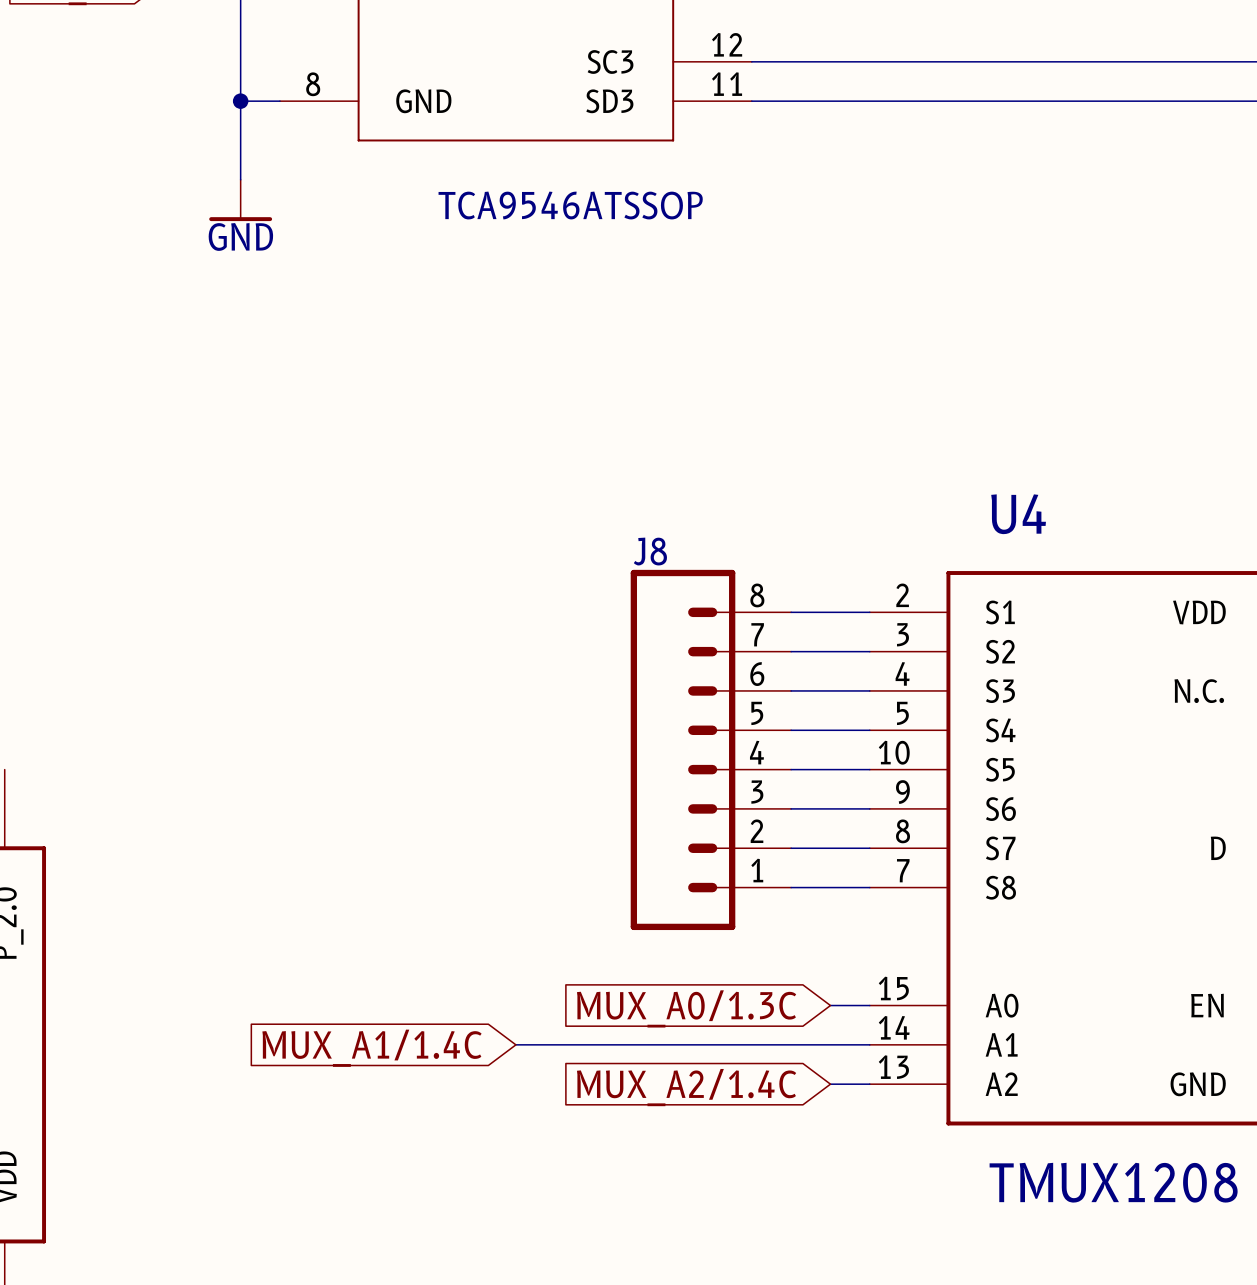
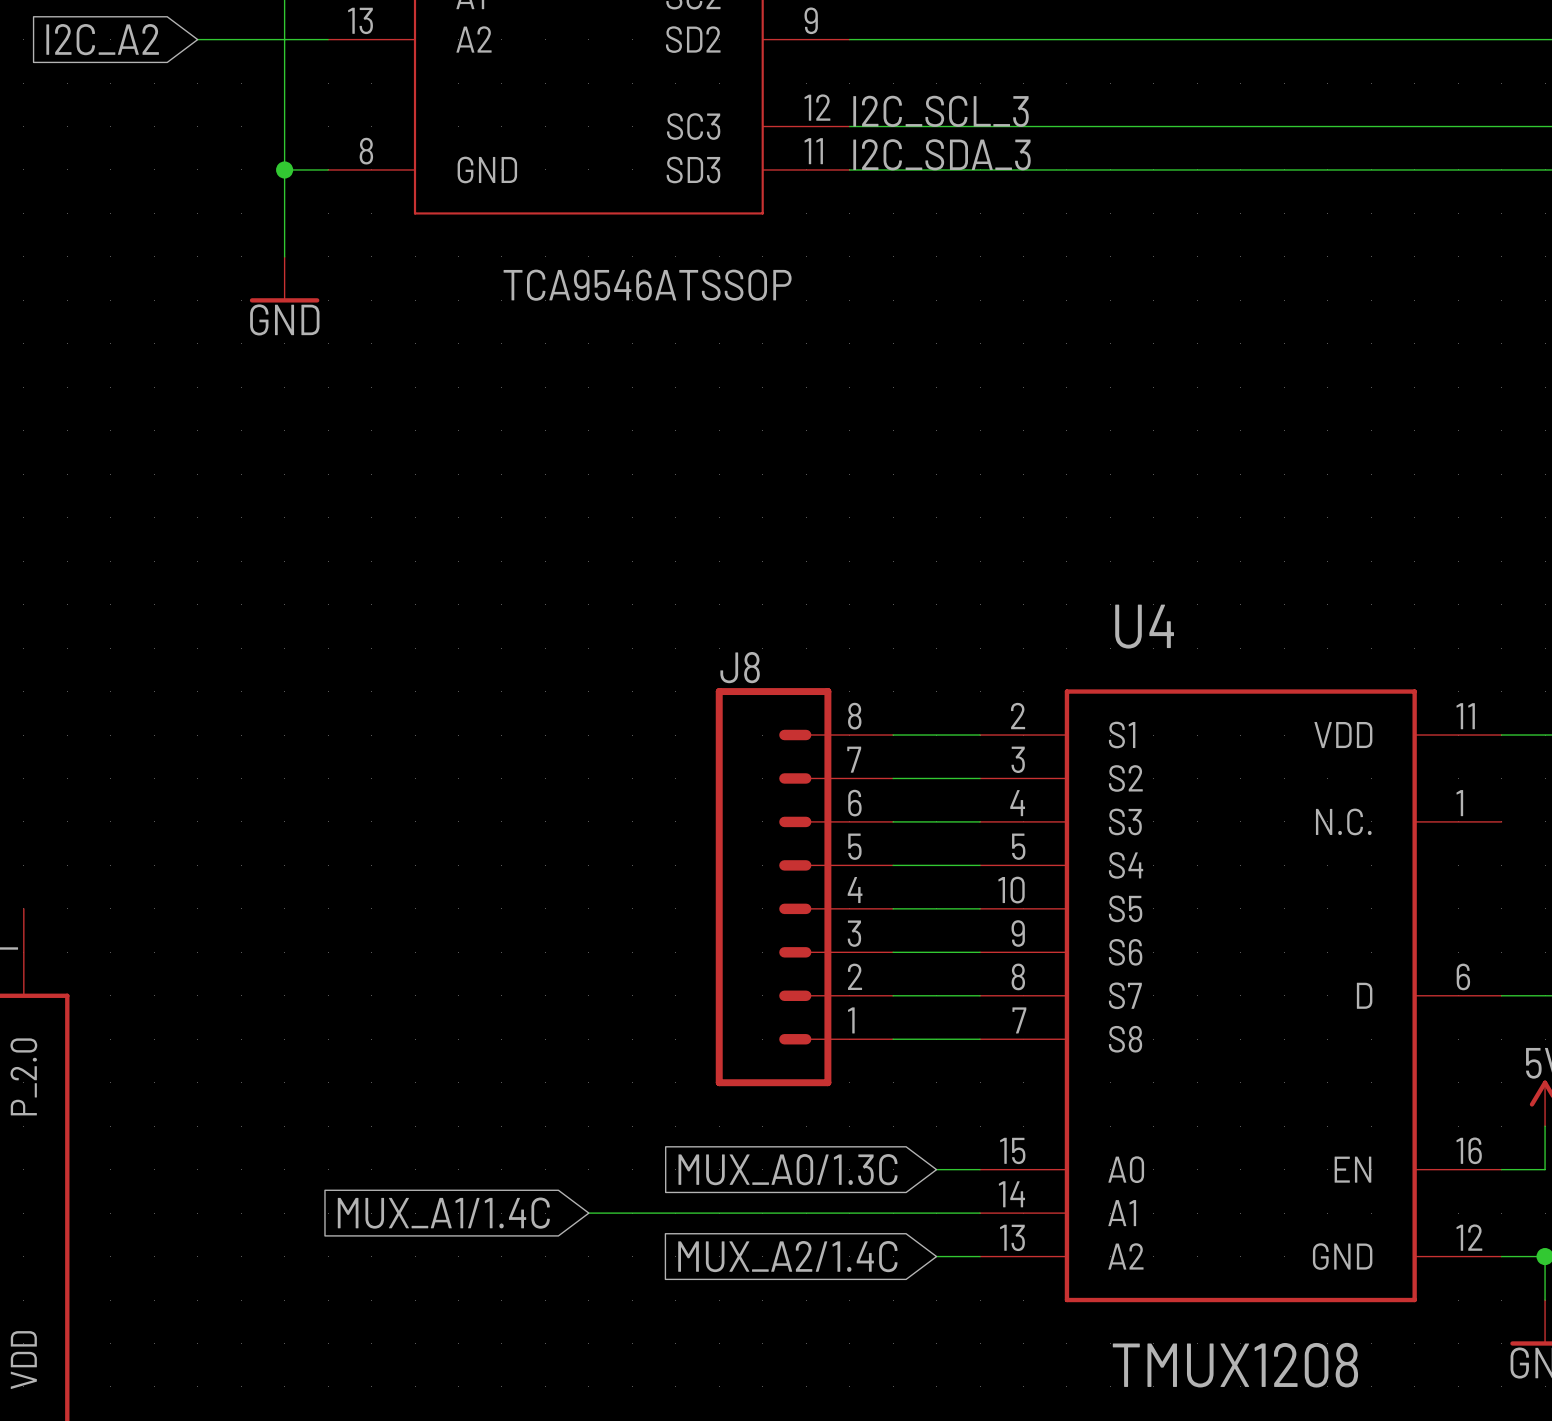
label: none -> I2C_SCL_3 (941, 111)
label: none -> I2C_SDA_3 (942, 154)

